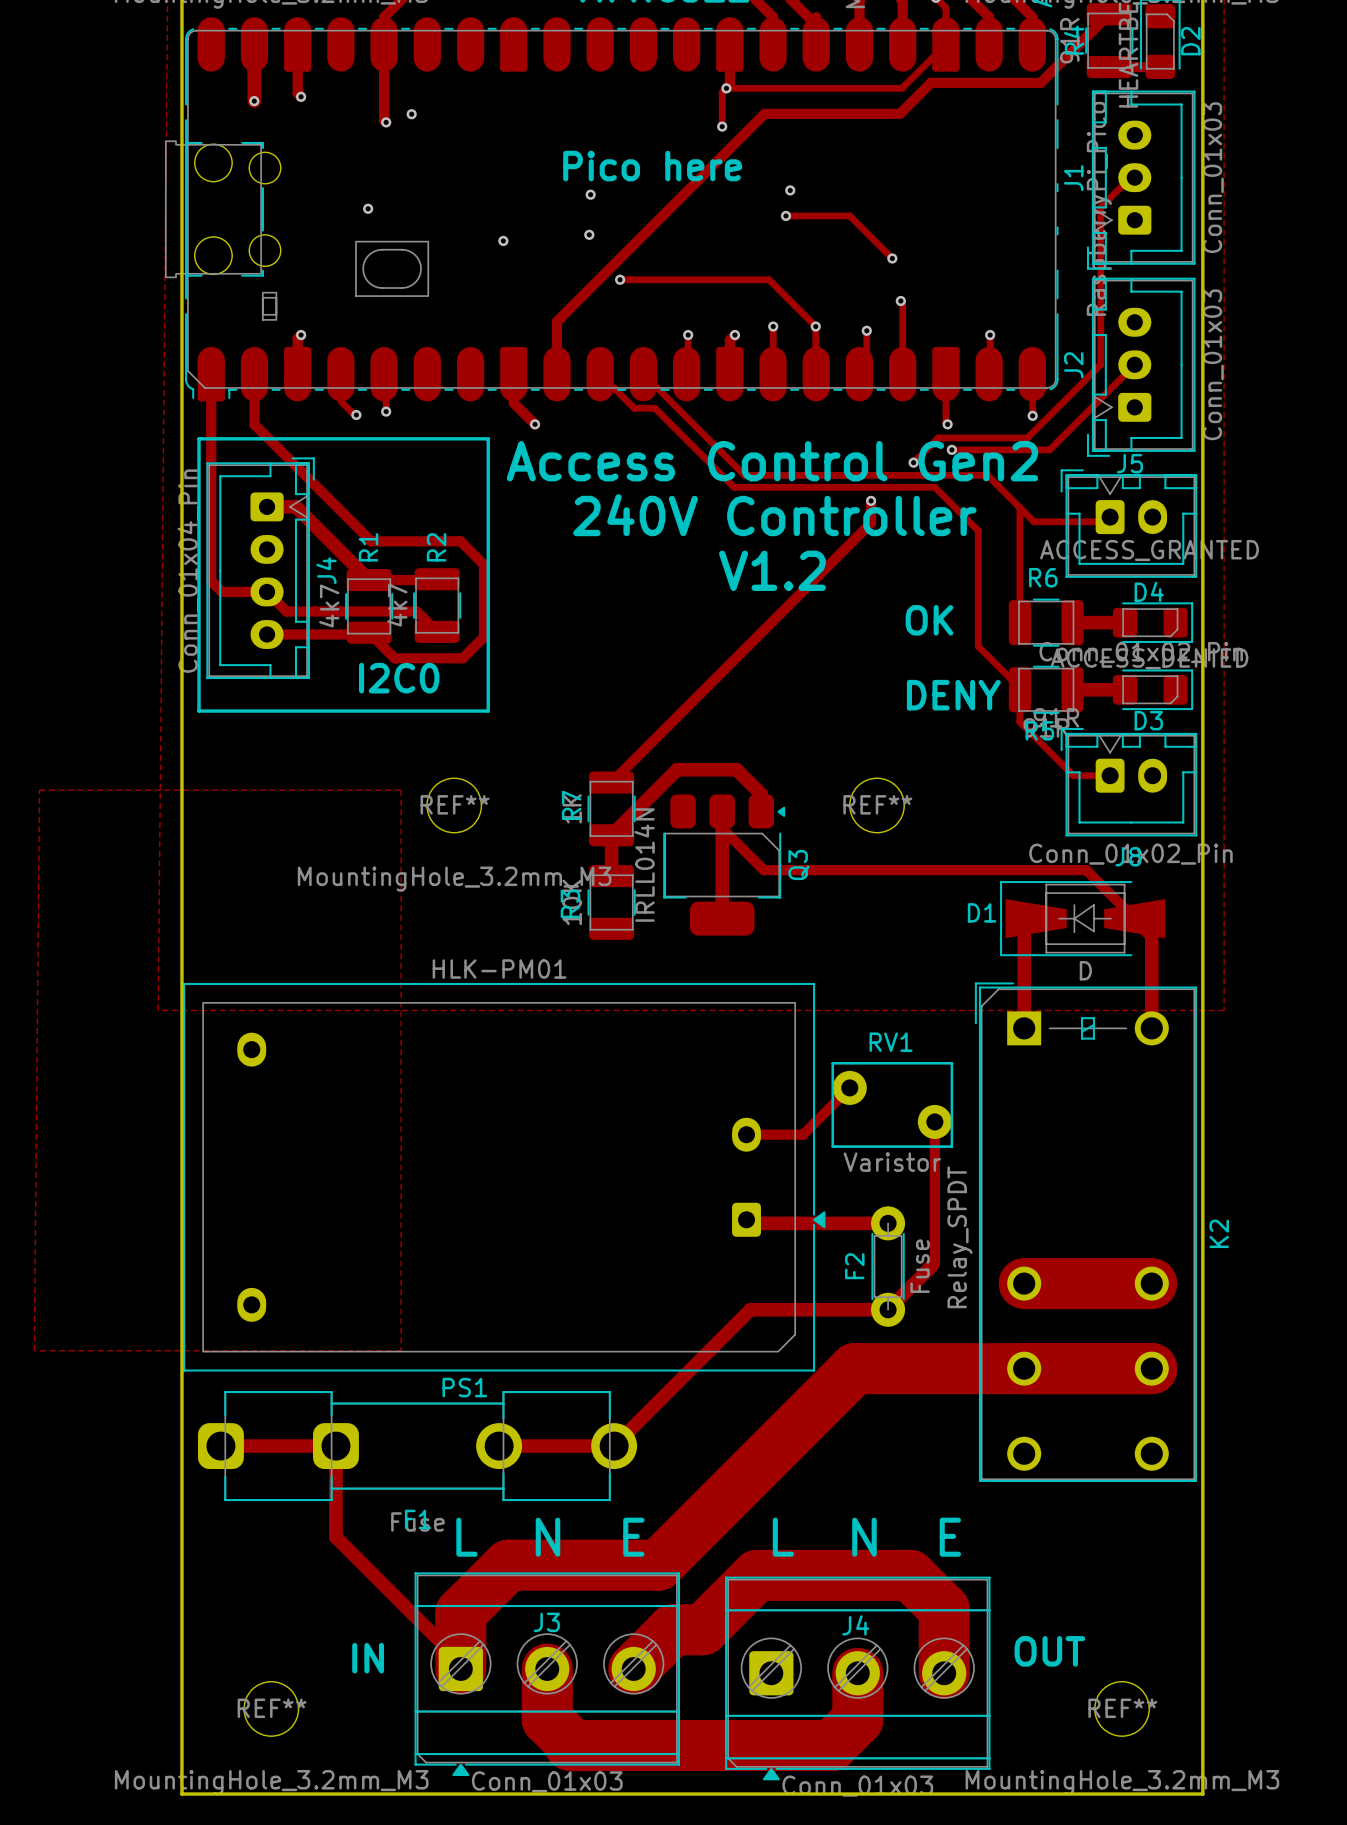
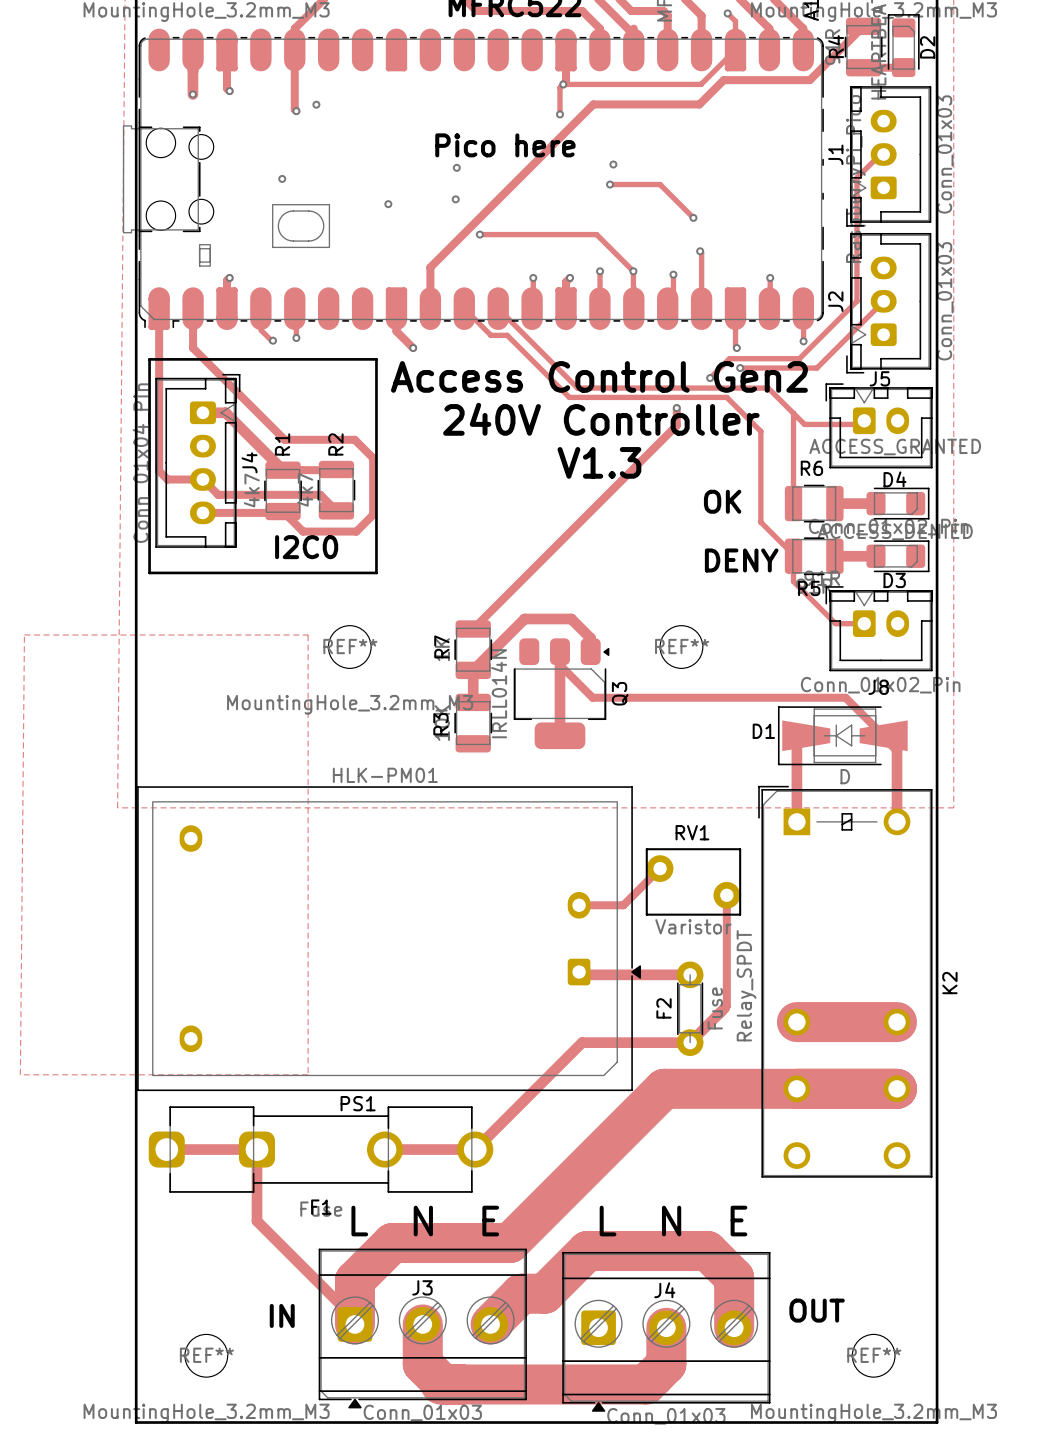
text: V1.2 (772, 570) -> V1.3 (599, 462)

